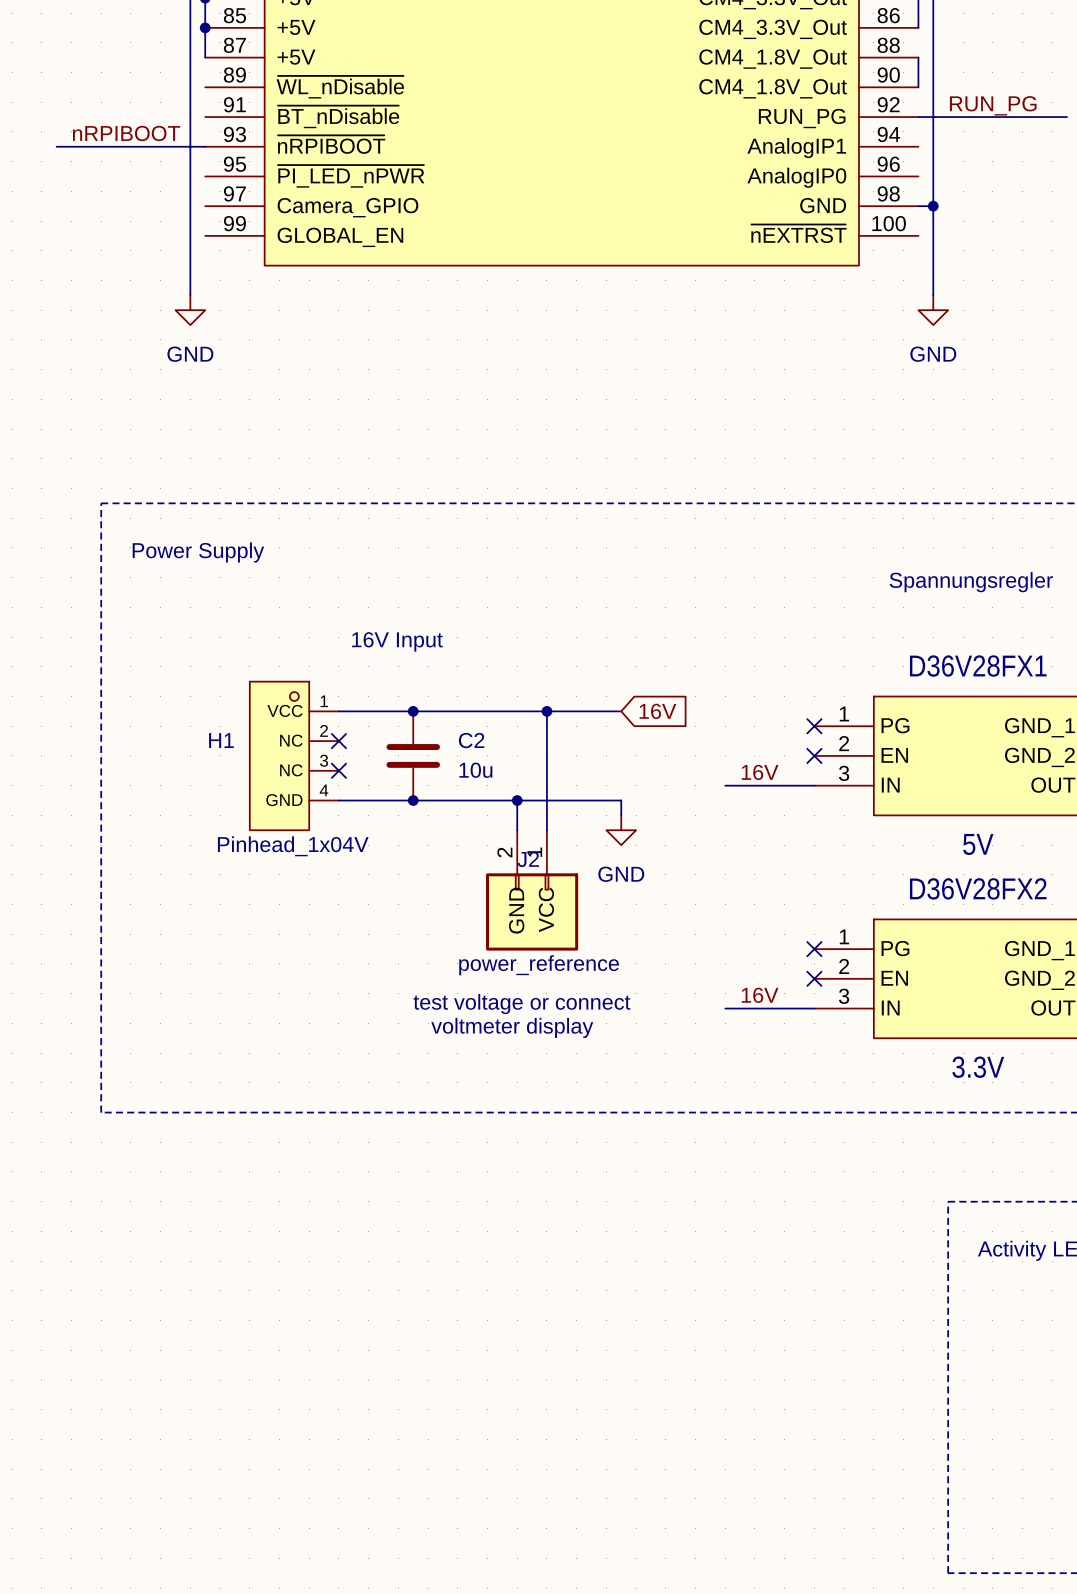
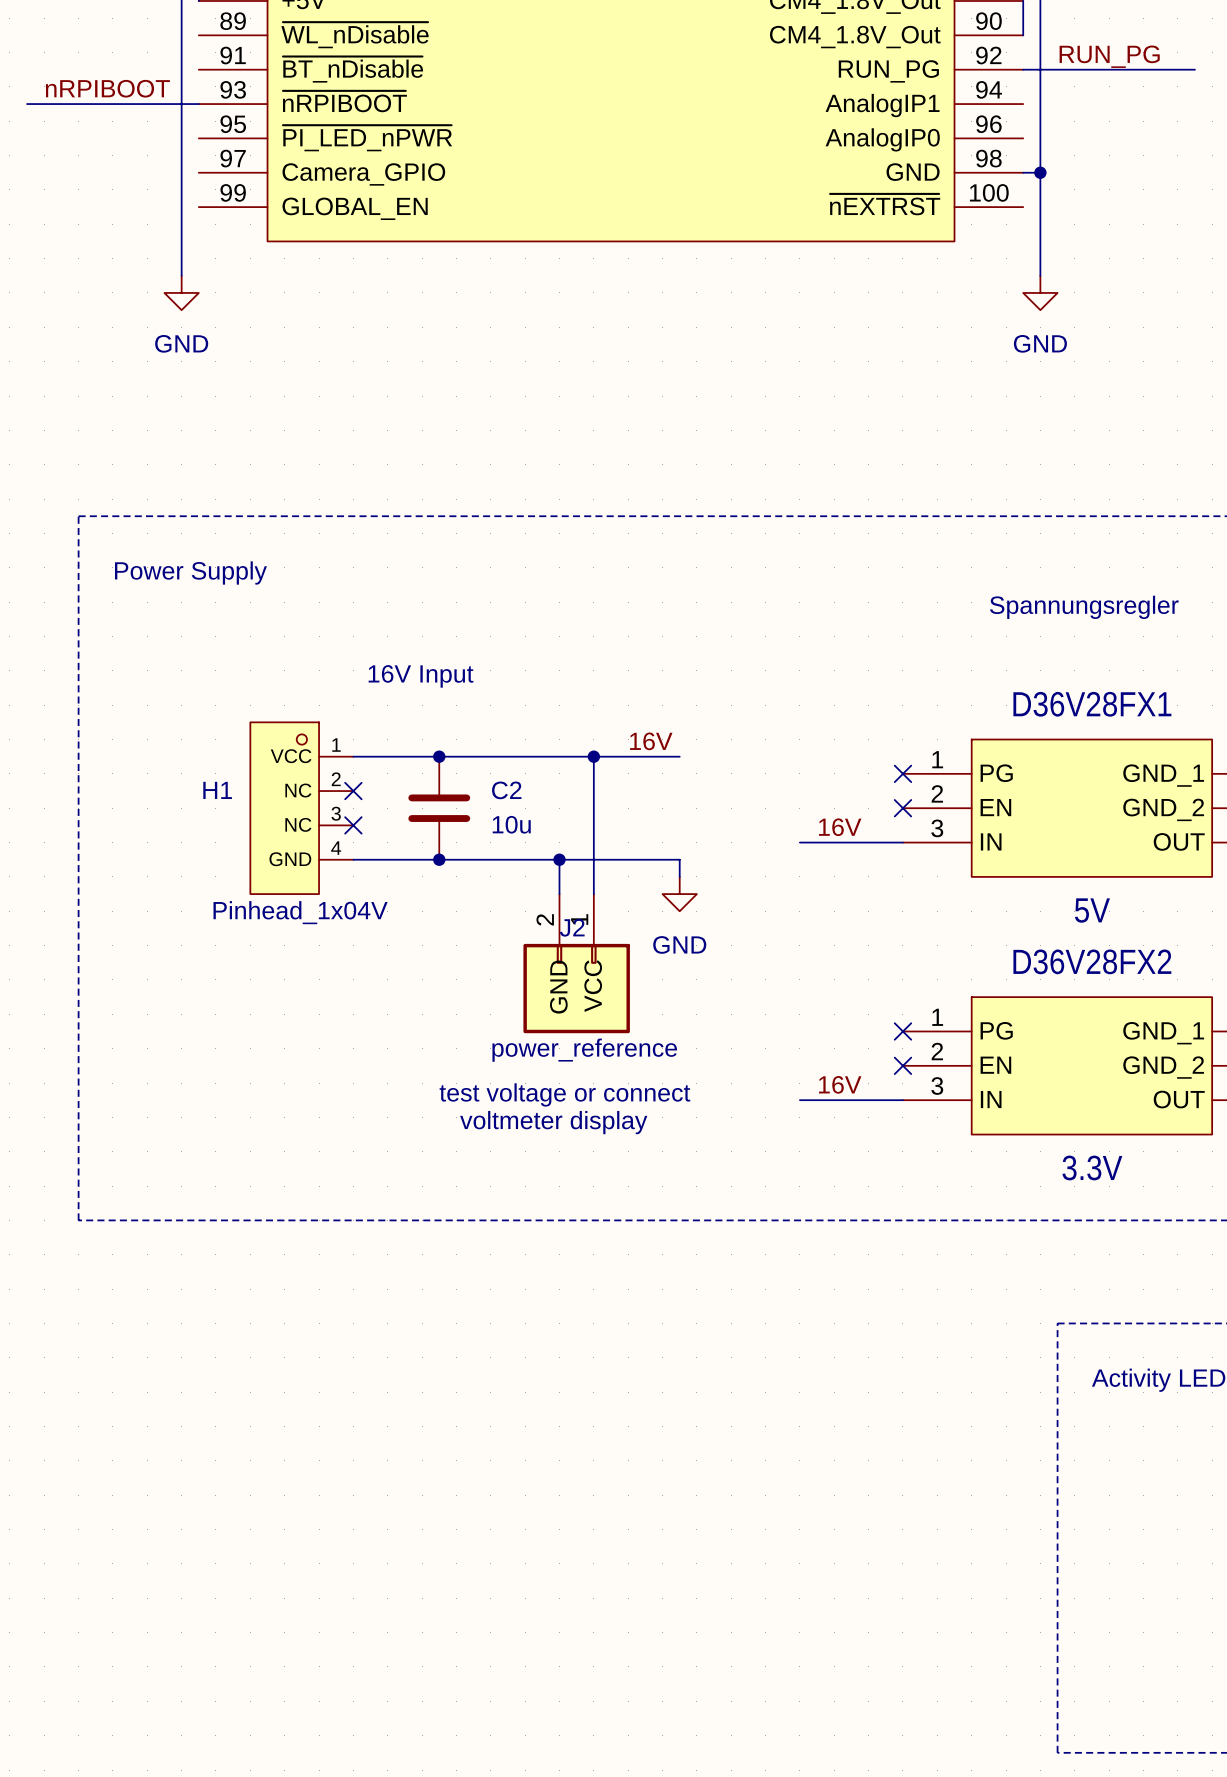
label: none -> 16V (651, 741)
global label: 16V (657, 711) -> none

